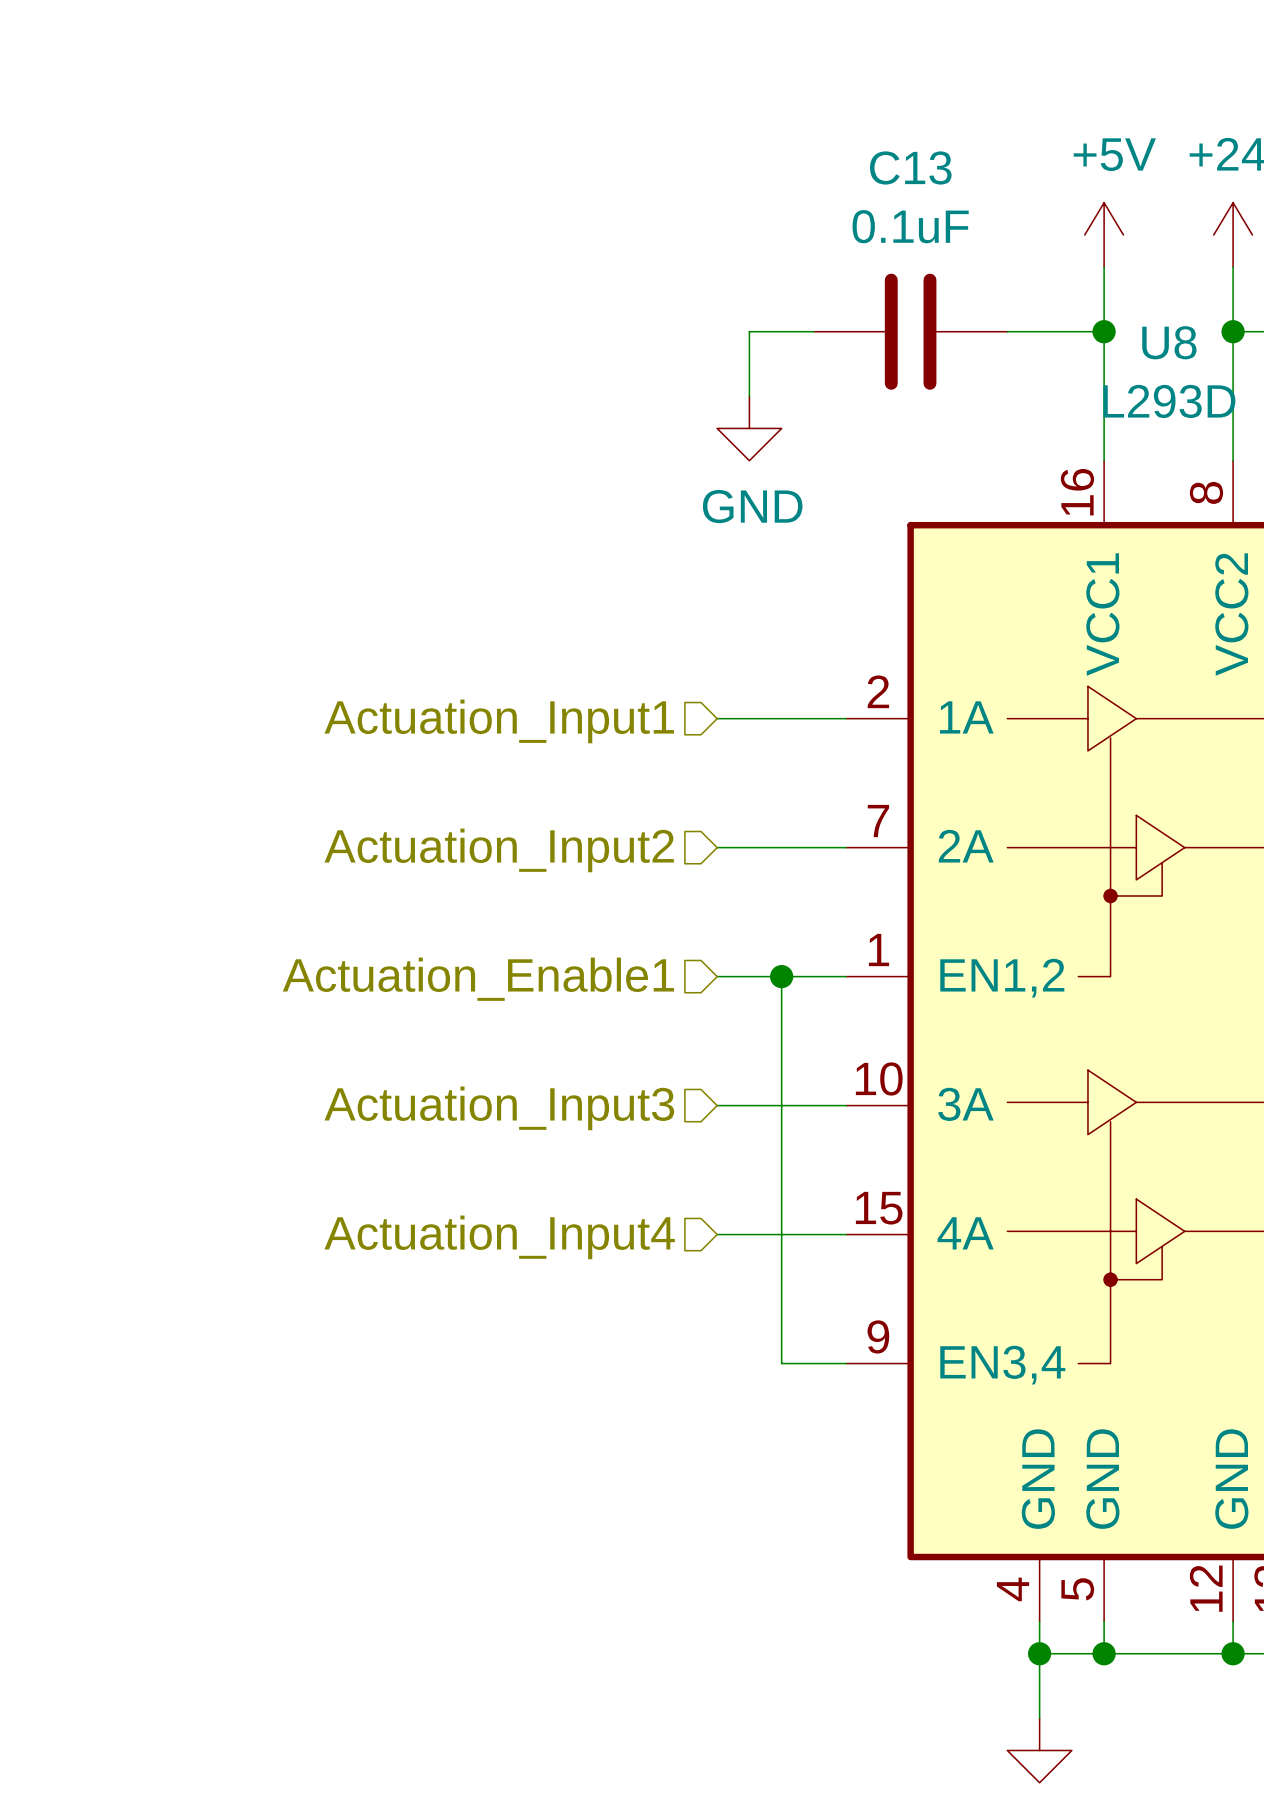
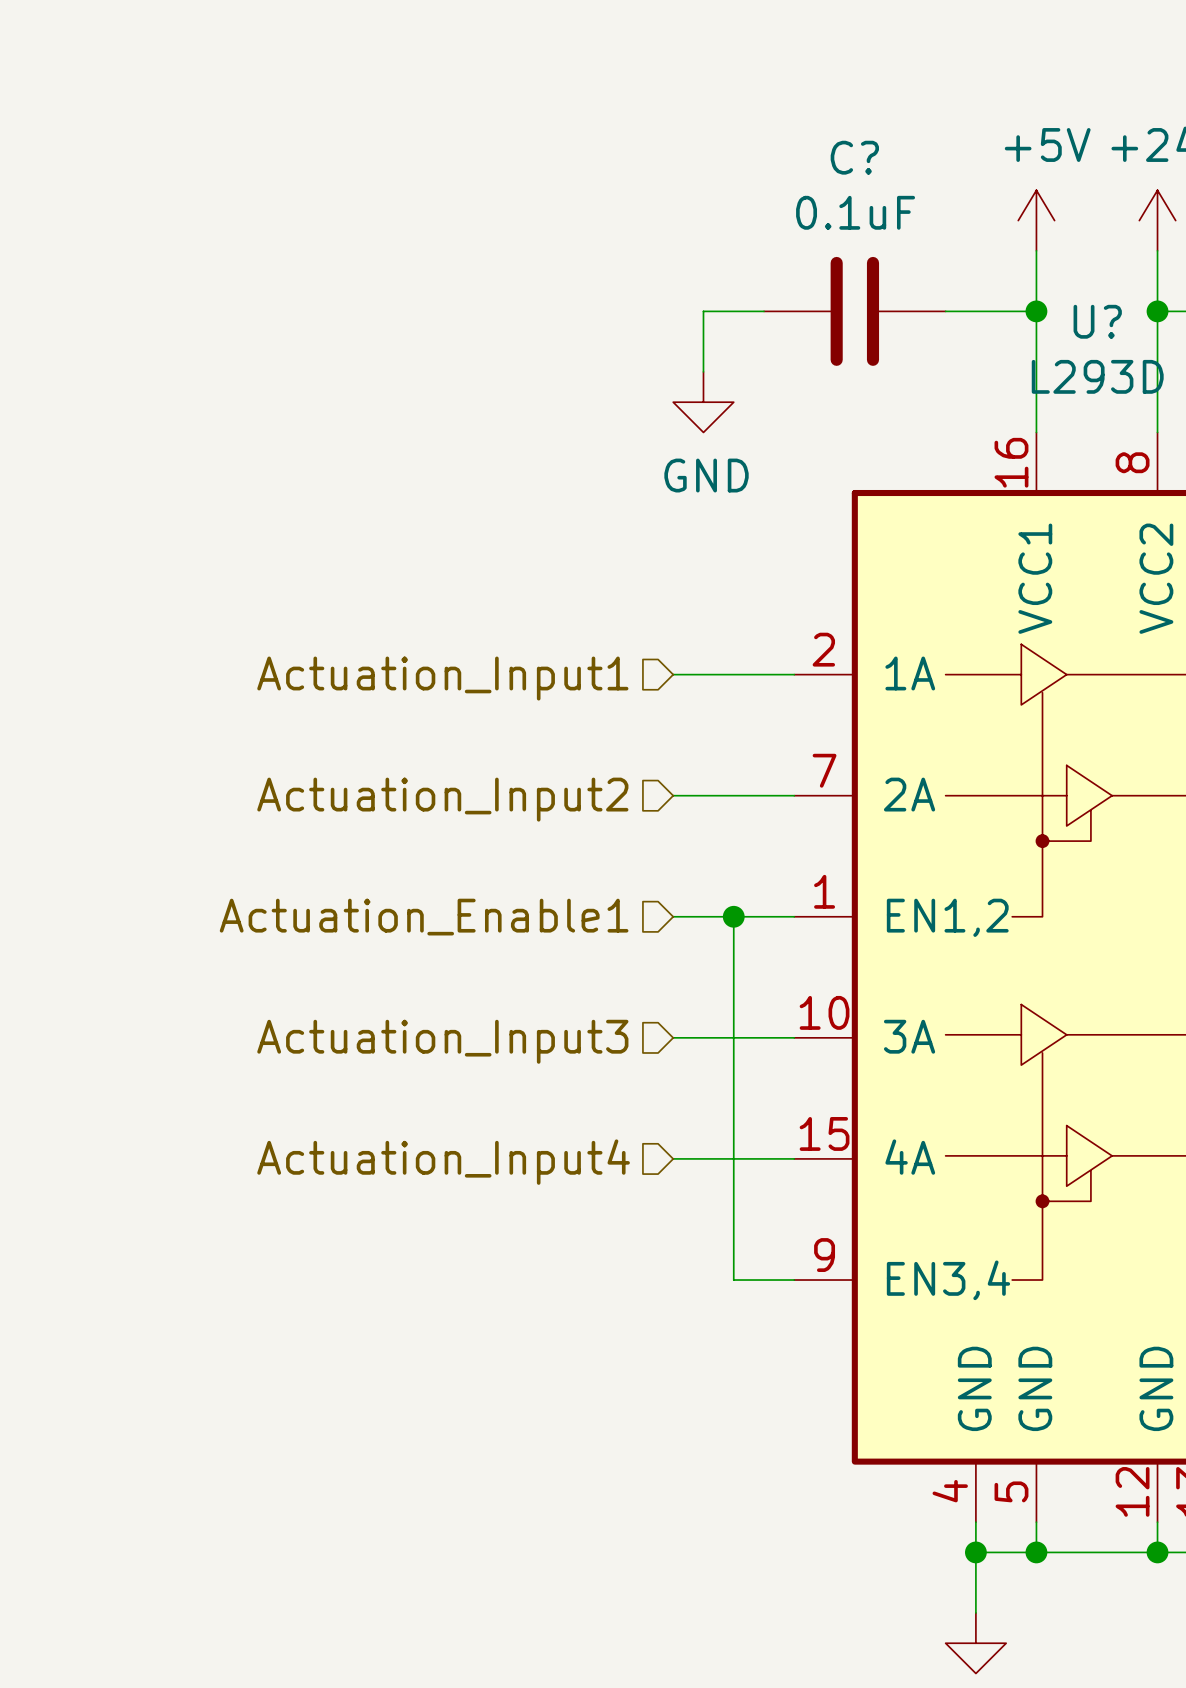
C13 name: C13 (910, 167) -> C? (854, 157)
U8 name: U8 (1169, 342) -> U? (1097, 321)

